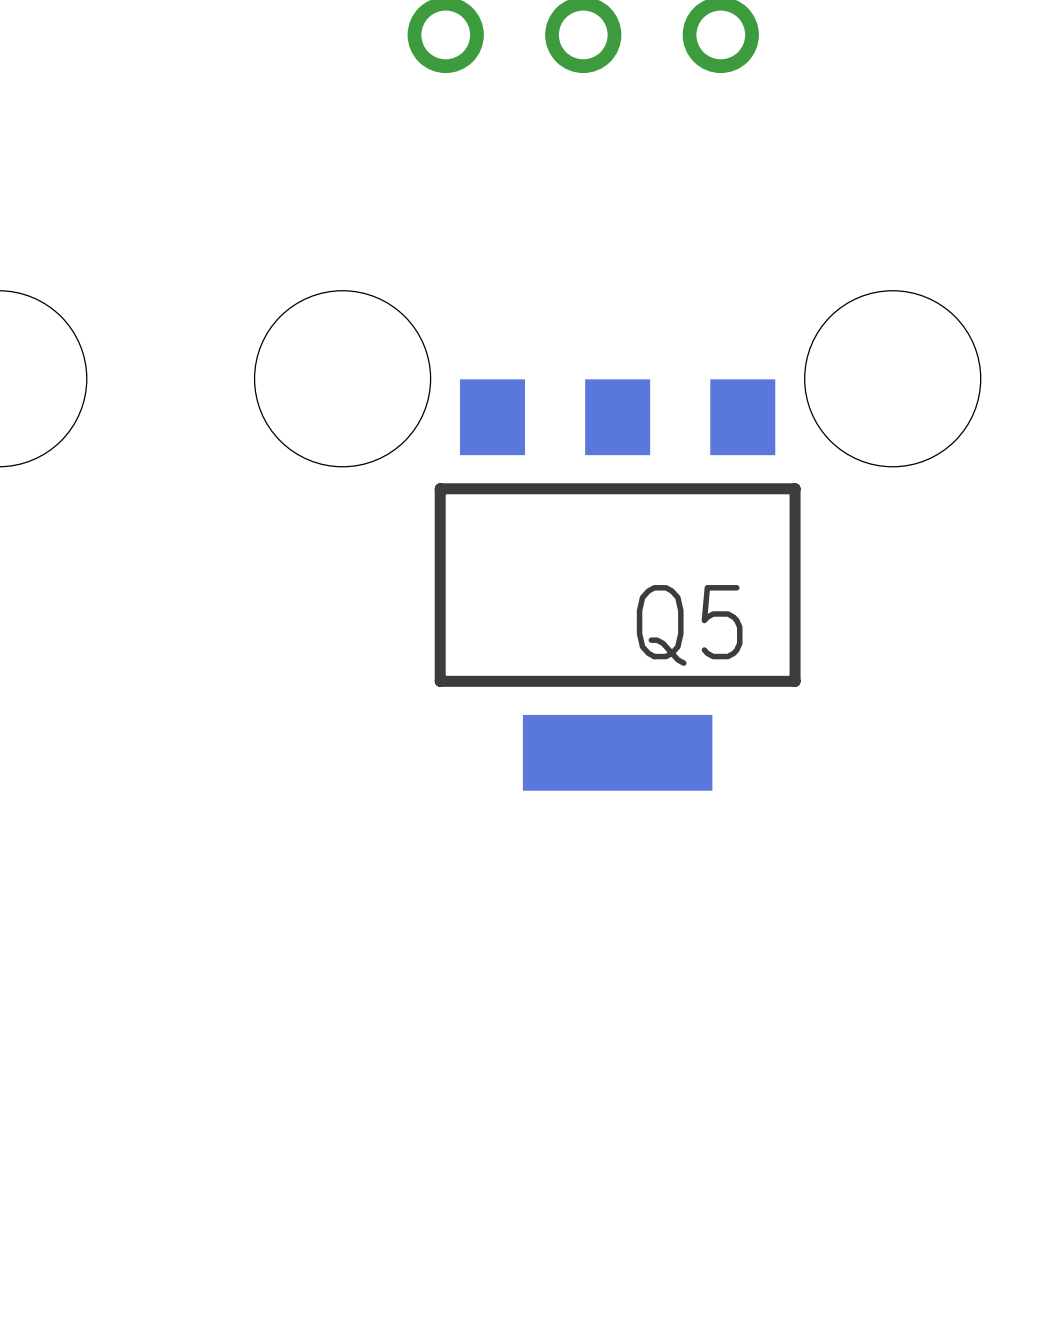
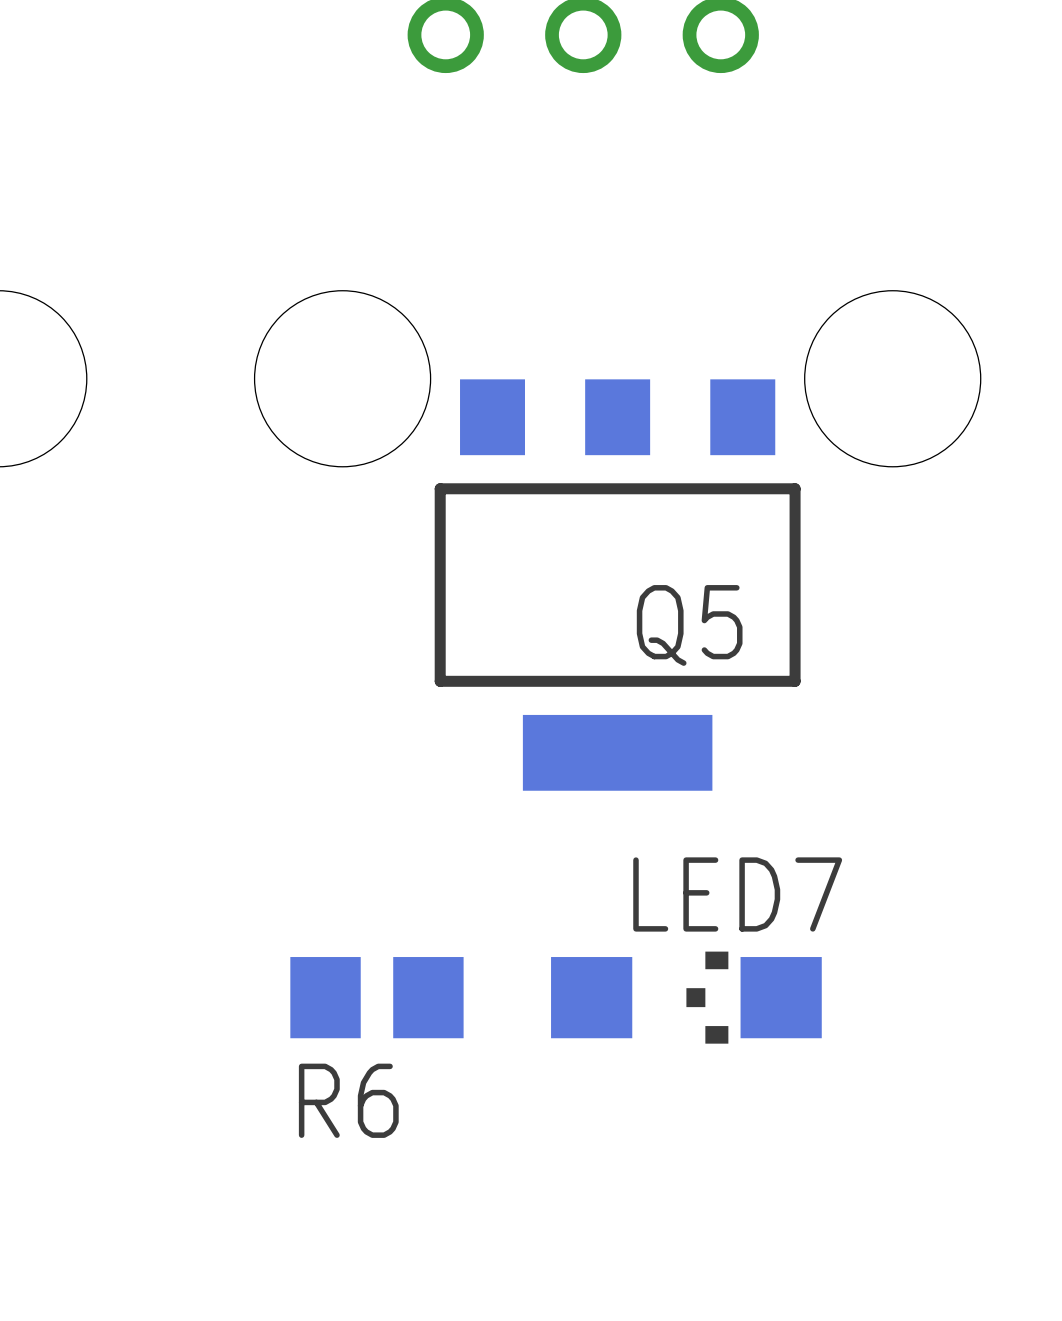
R6: none -> (376, 997)
LED7: none -> (686, 997)

